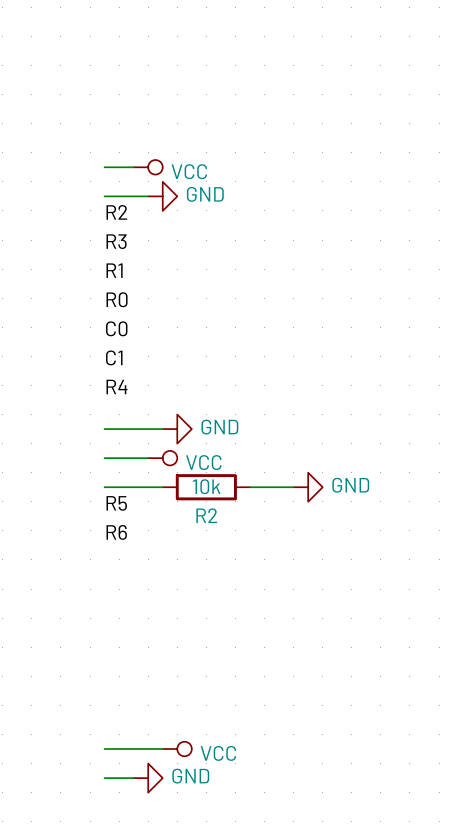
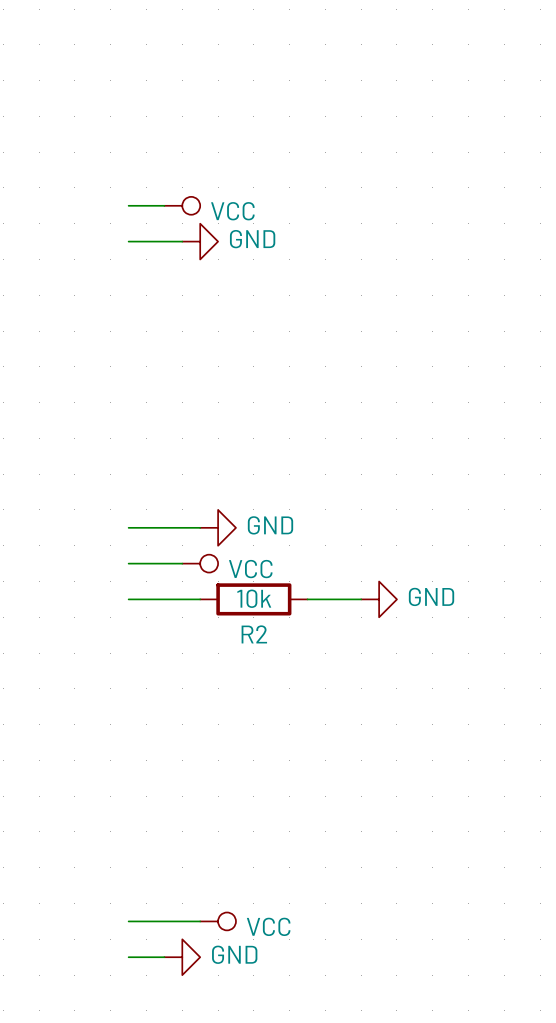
label: R2 (116, 212) -> none
label: R3 (116, 241) -> none
label: R1 (114, 270) -> none
label: R0 (117, 299) -> none
label: C0 (116, 328) -> none
label: C1 (114, 357) -> none
label: R4 (116, 387) -> none
label: R5 (116, 503) -> none
label: R6 (116, 532) -> none

